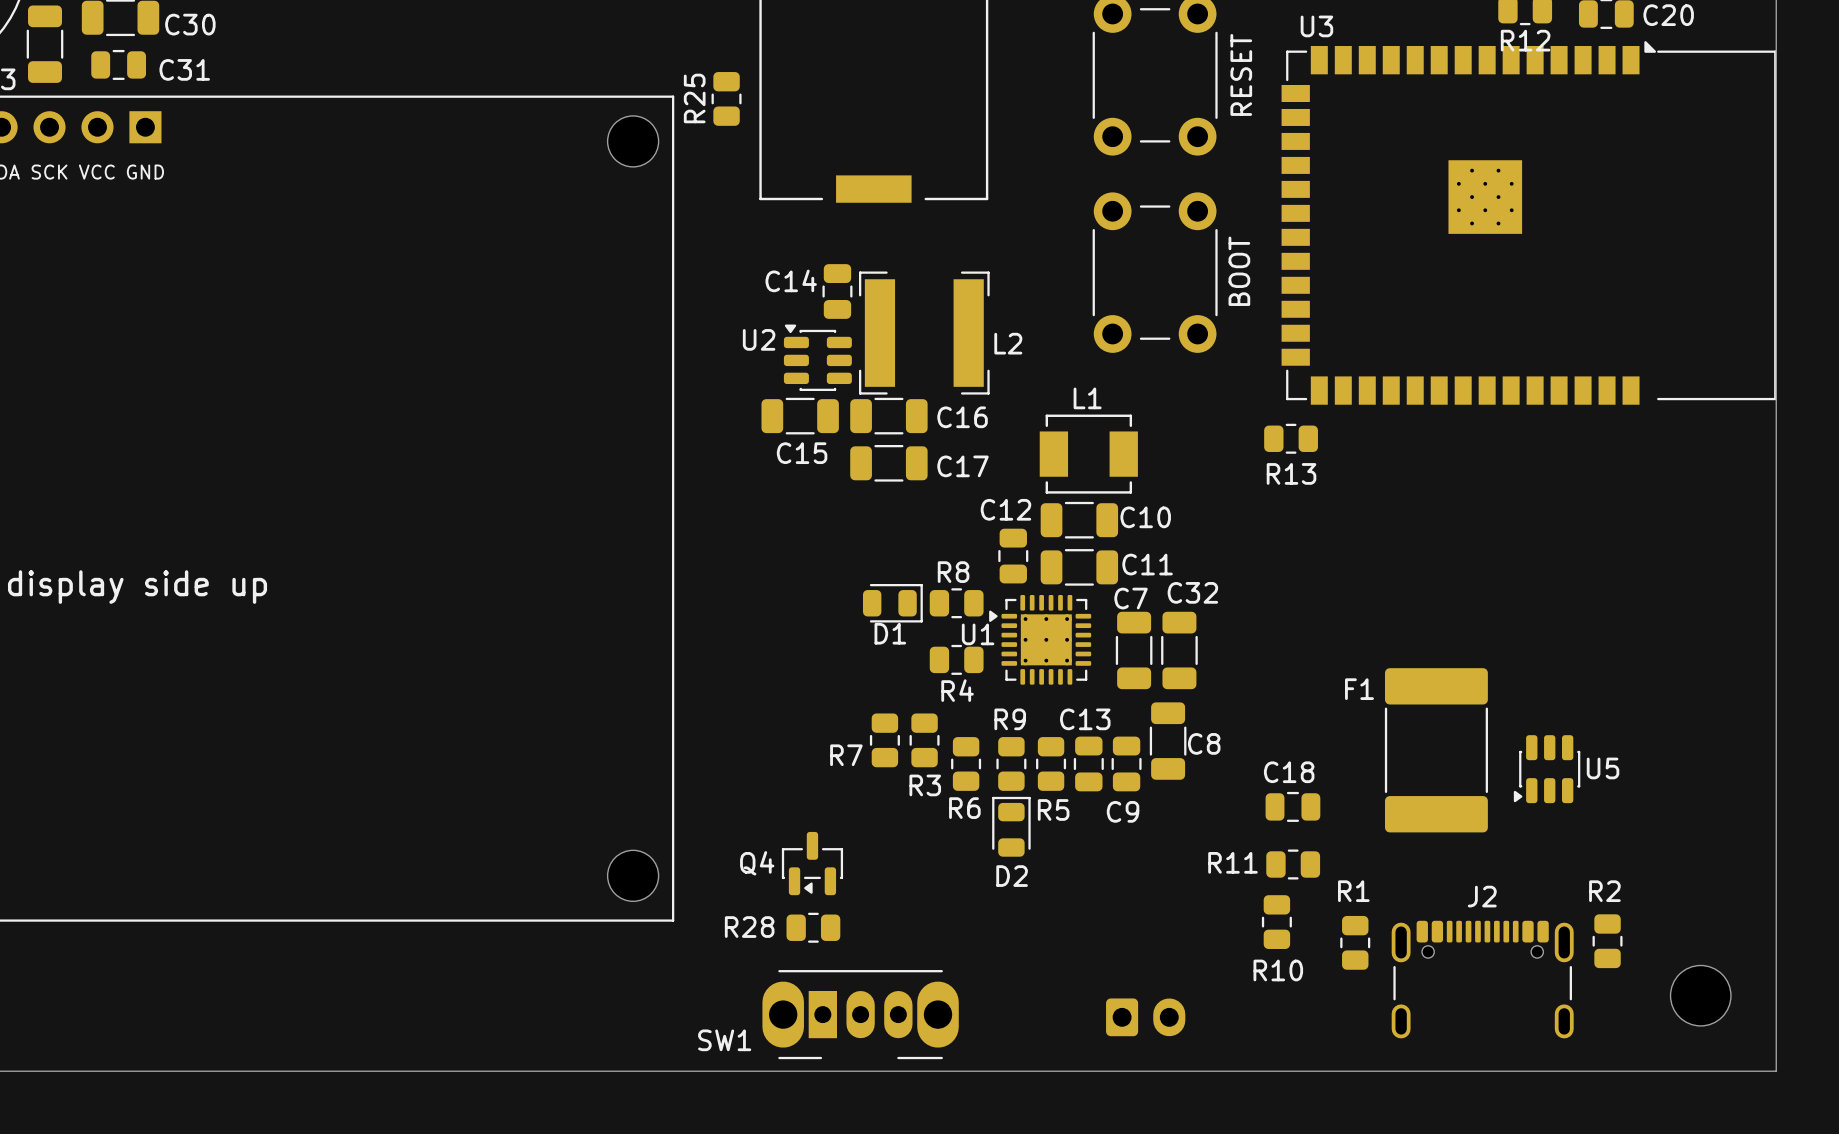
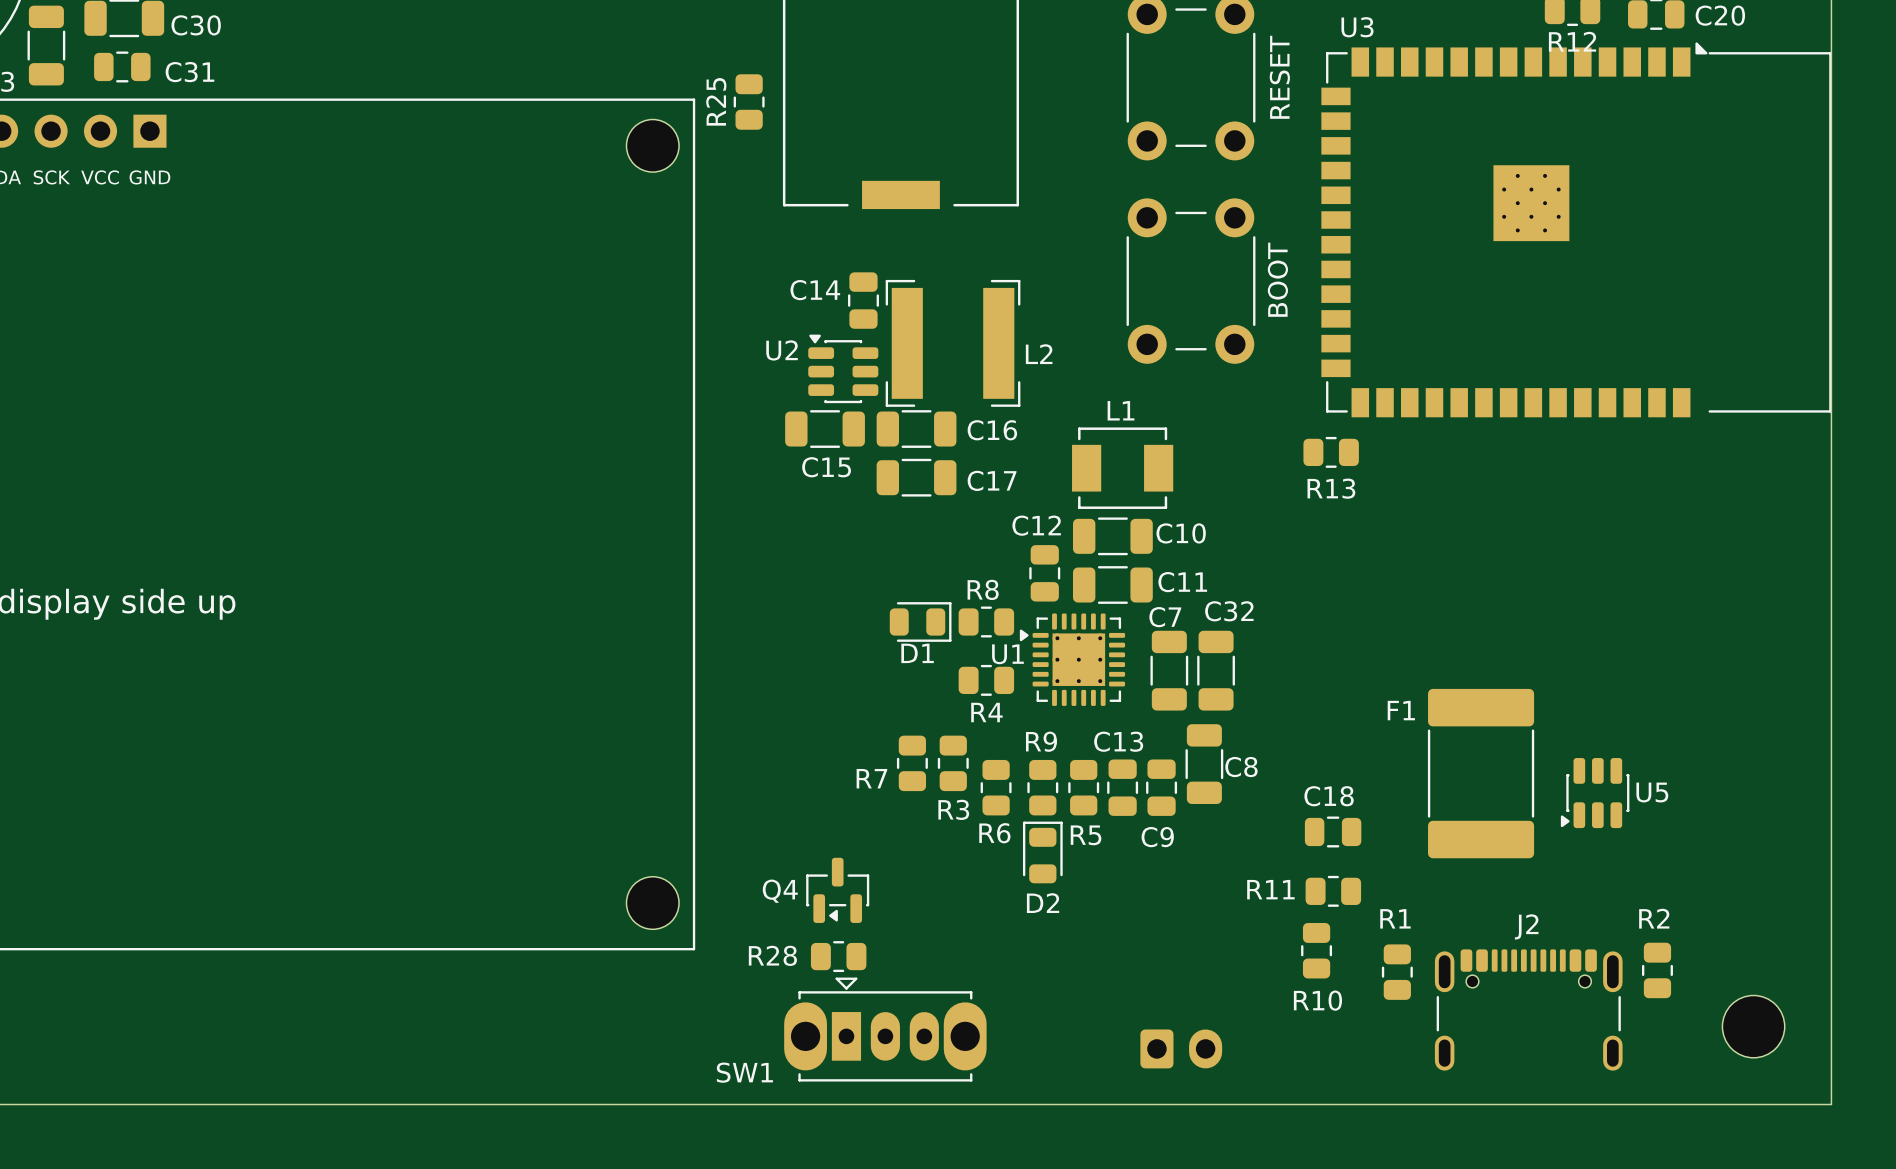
SW1 footprint: [762, 970, 959, 1060] -> [784, 977, 987, 1082]

